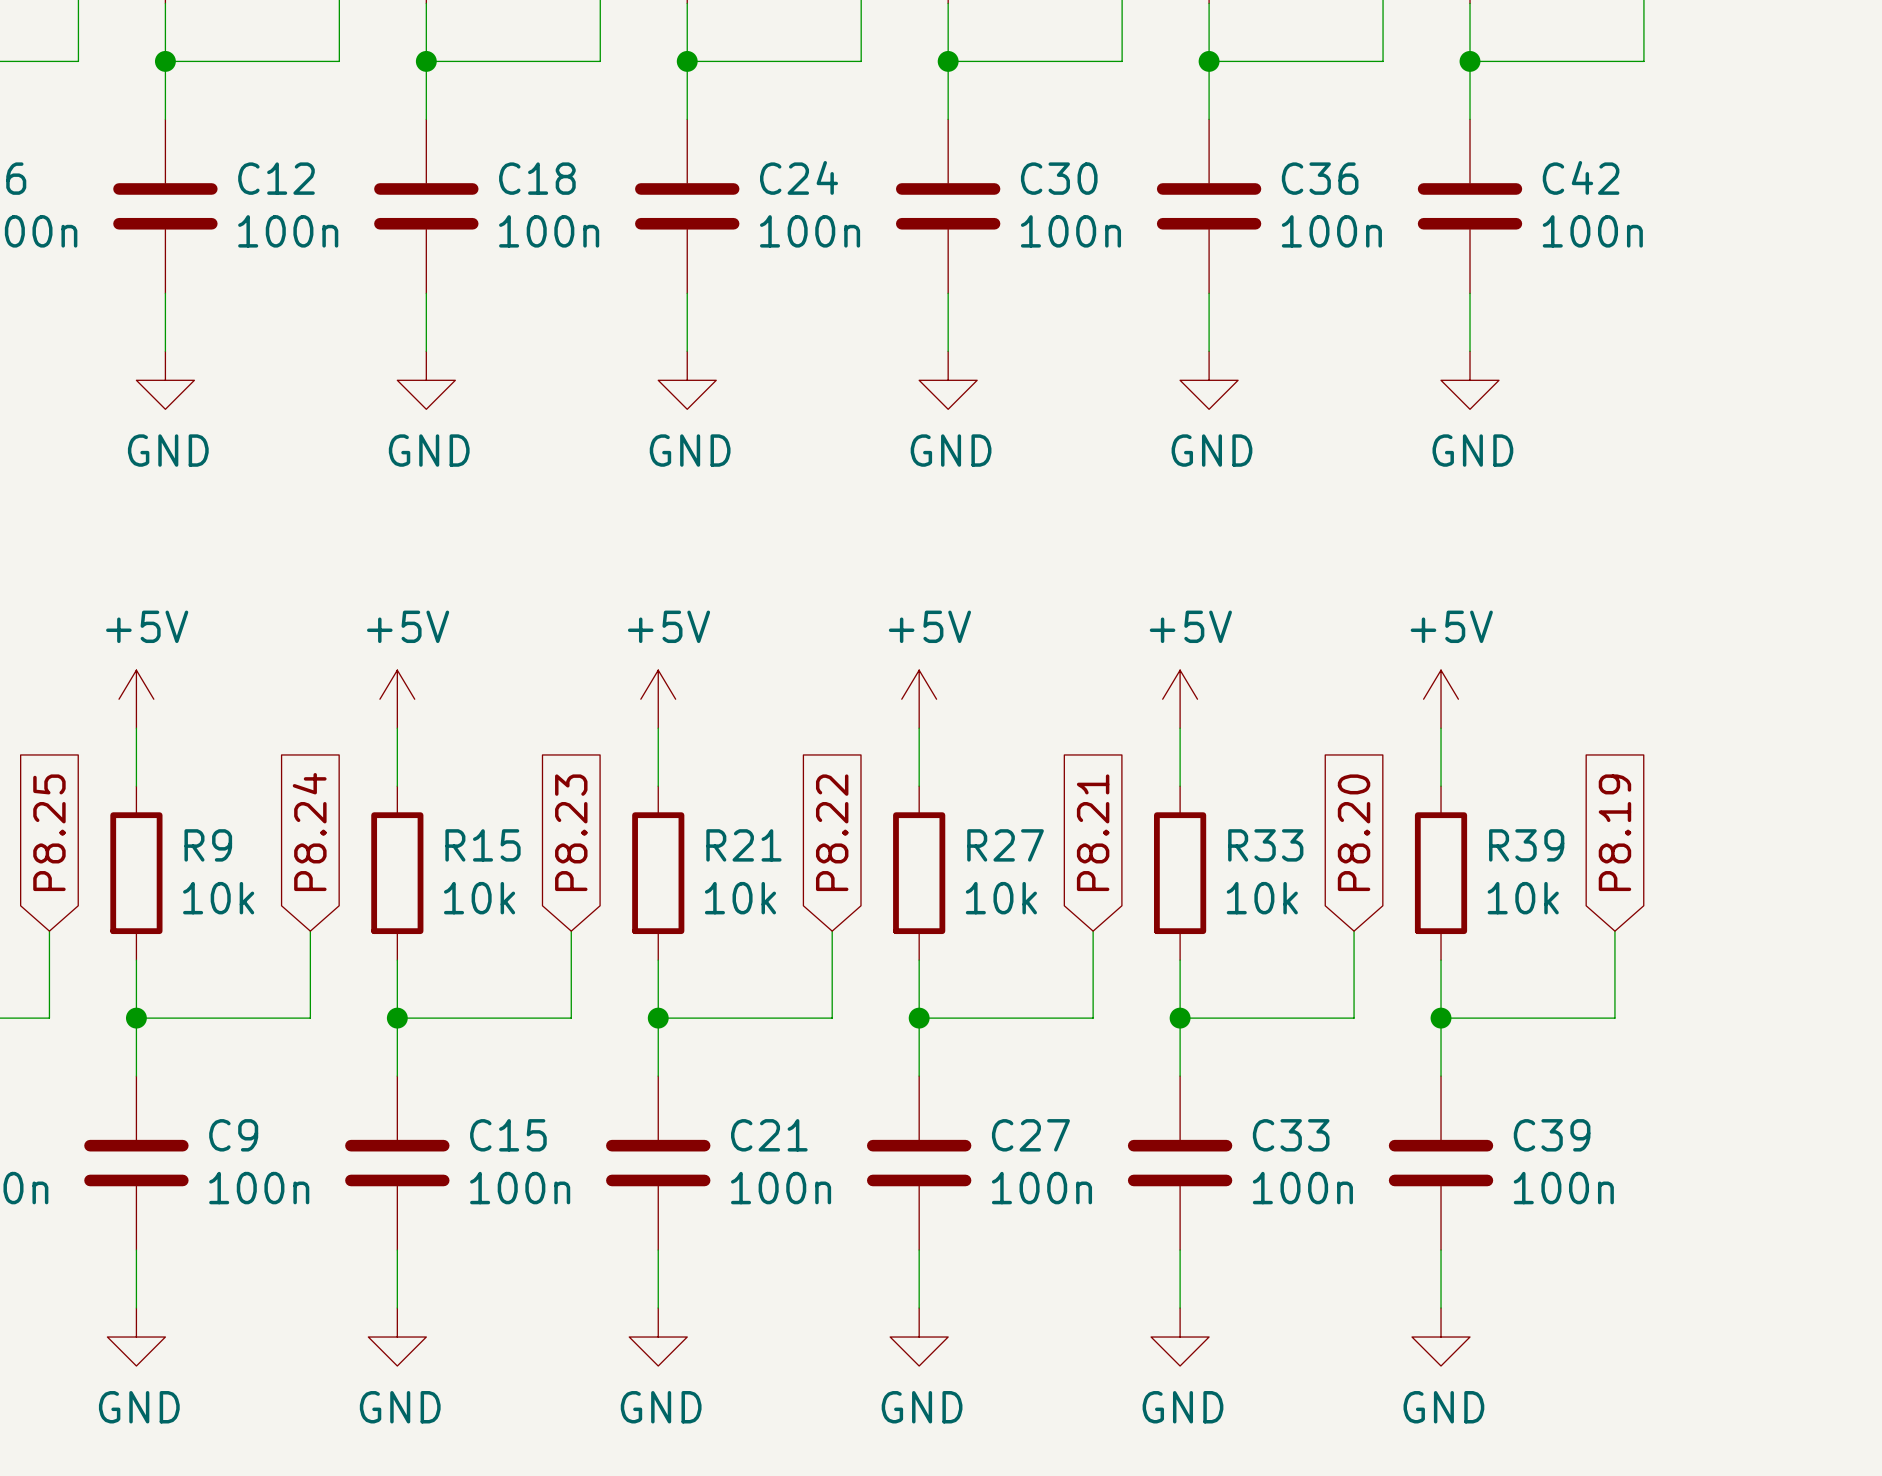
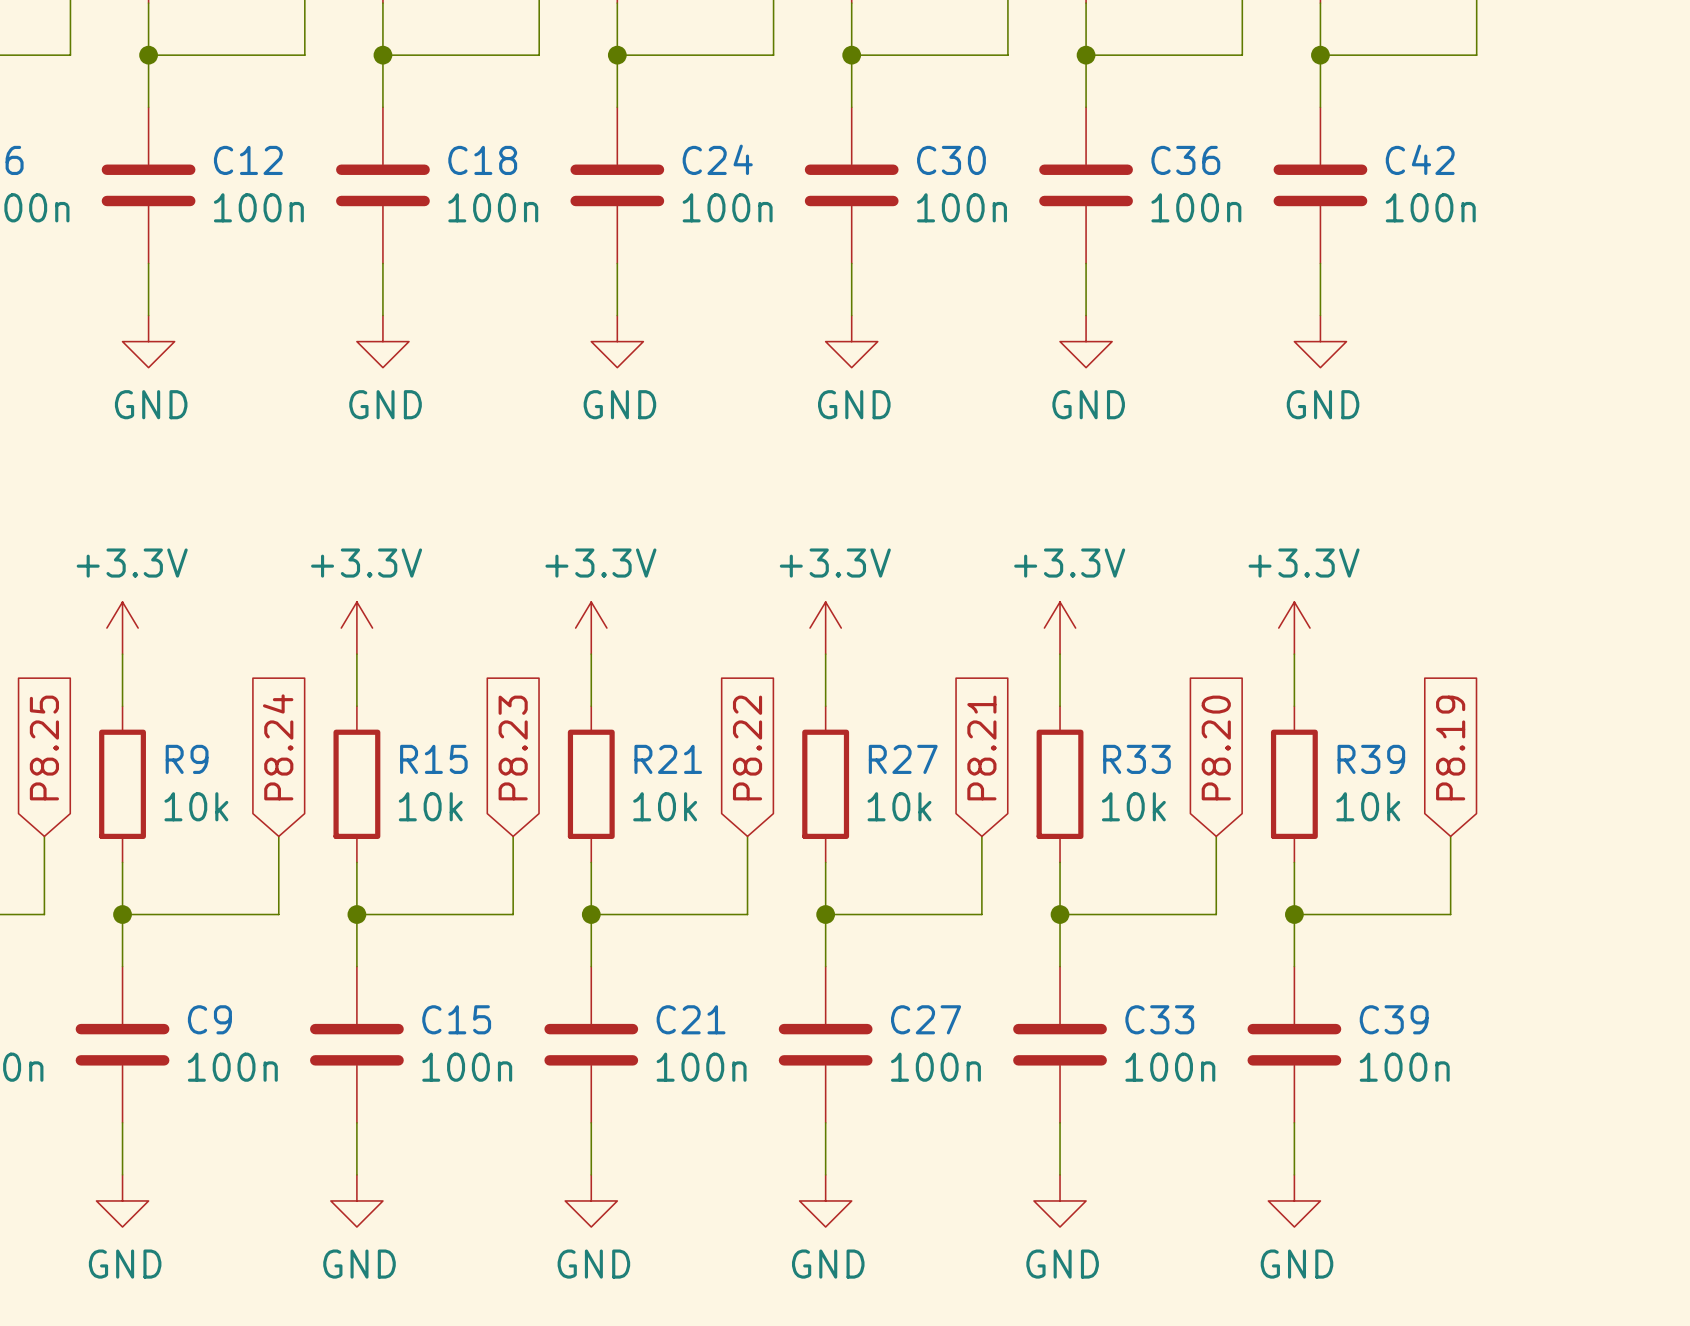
power symbol: +5V (136, 699) -> +3.3V (122, 628)
power symbol: +5V (397, 699) -> +3.3V (356, 628)
power symbol: +5V (658, 699) -> +3.3V (591, 628)
power symbol: +5V (919, 699) -> +3.3V (825, 628)
power symbol: +5V (1180, 699) -> +3.3V (1060, 628)
power symbol: +5V (1441, 699) -> +3.3V (1294, 628)

